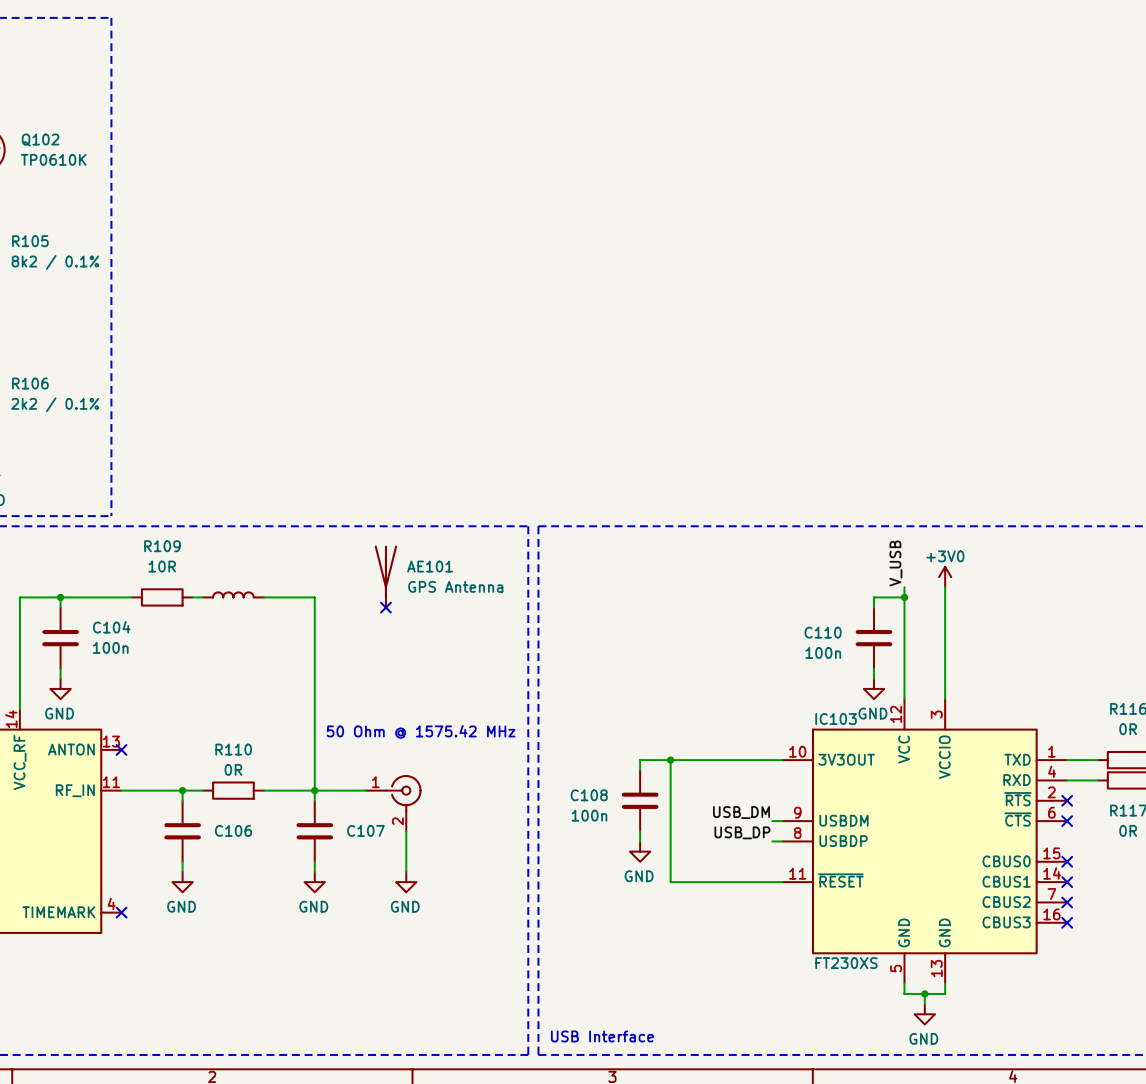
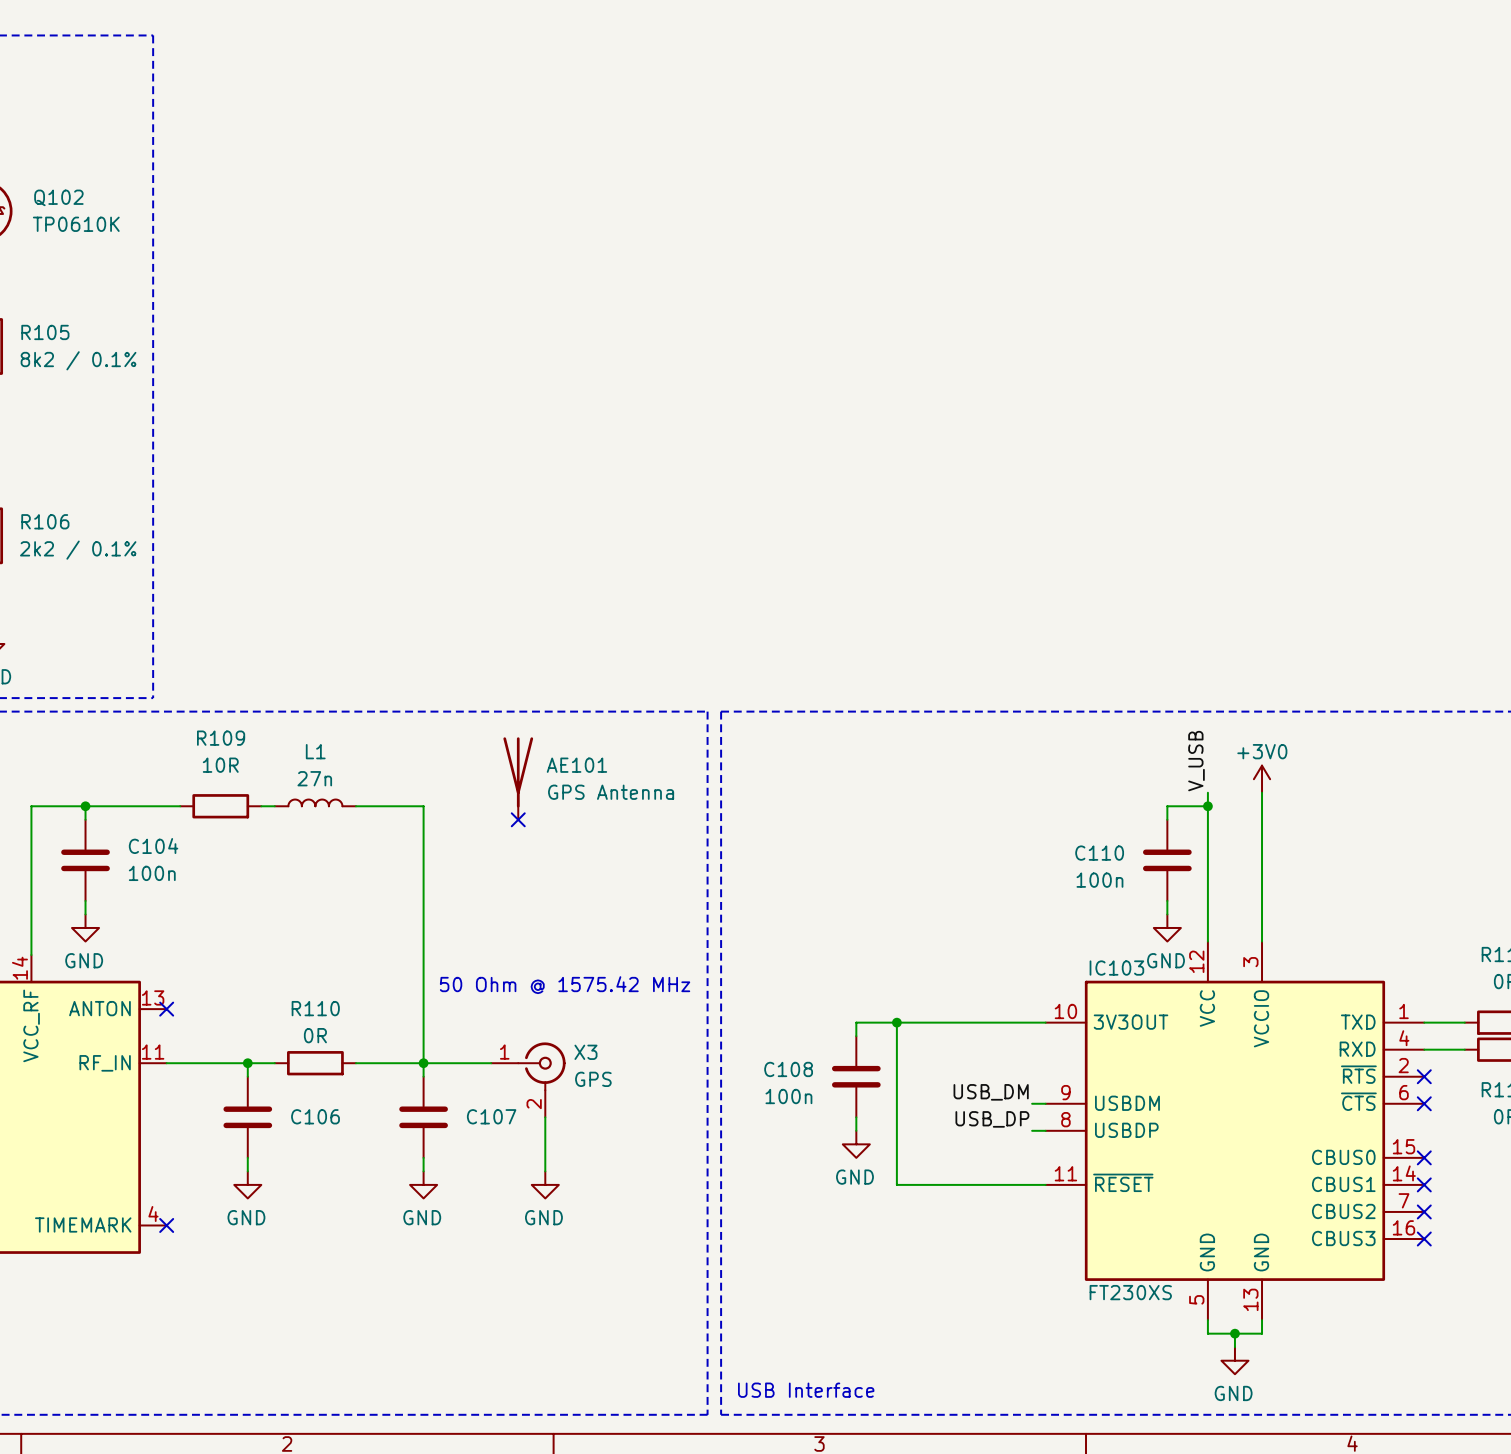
L1 name: none -> L1 (315, 751)
L1 value: none -> 27n (314, 778)
X3 name: none -> X3 (585, 1052)
X3 value: none -> GPS (593, 1079)

